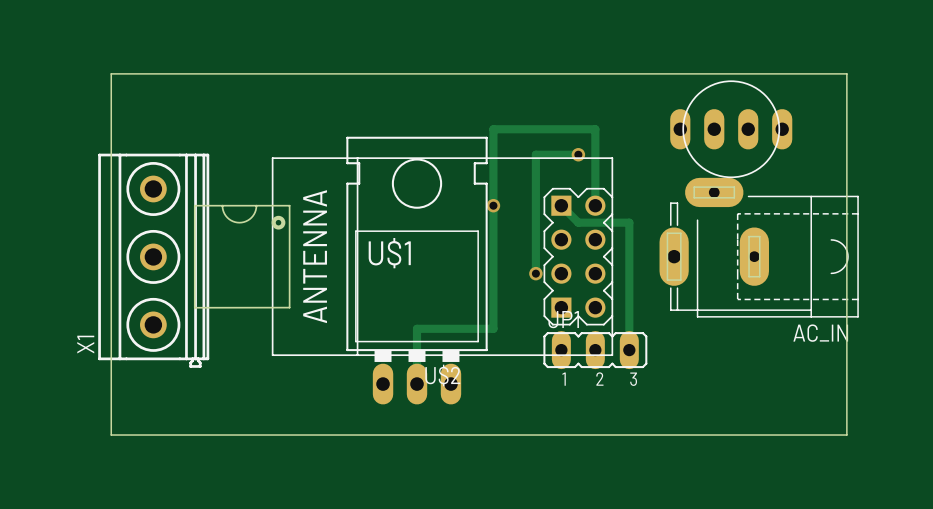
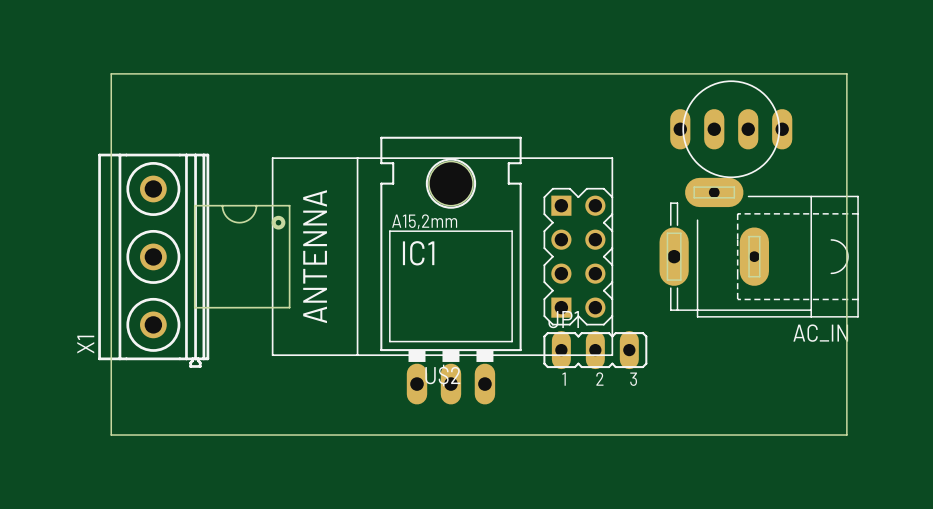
track: (578, 154) (535, 154) (535, 273) -> none
via: (578, 154) -> none
via: (493, 205) -> none
track: (561, 205) (578, 222) (629, 222) (629, 350) -> none
track: (595, 205) (595, 129) (493, 129) (493, 328) (417, 328) (417, 384) -> none
U$1: (417, 270) -> none
IC1: none -> (450, 270)
via: (535, 273) -> none

